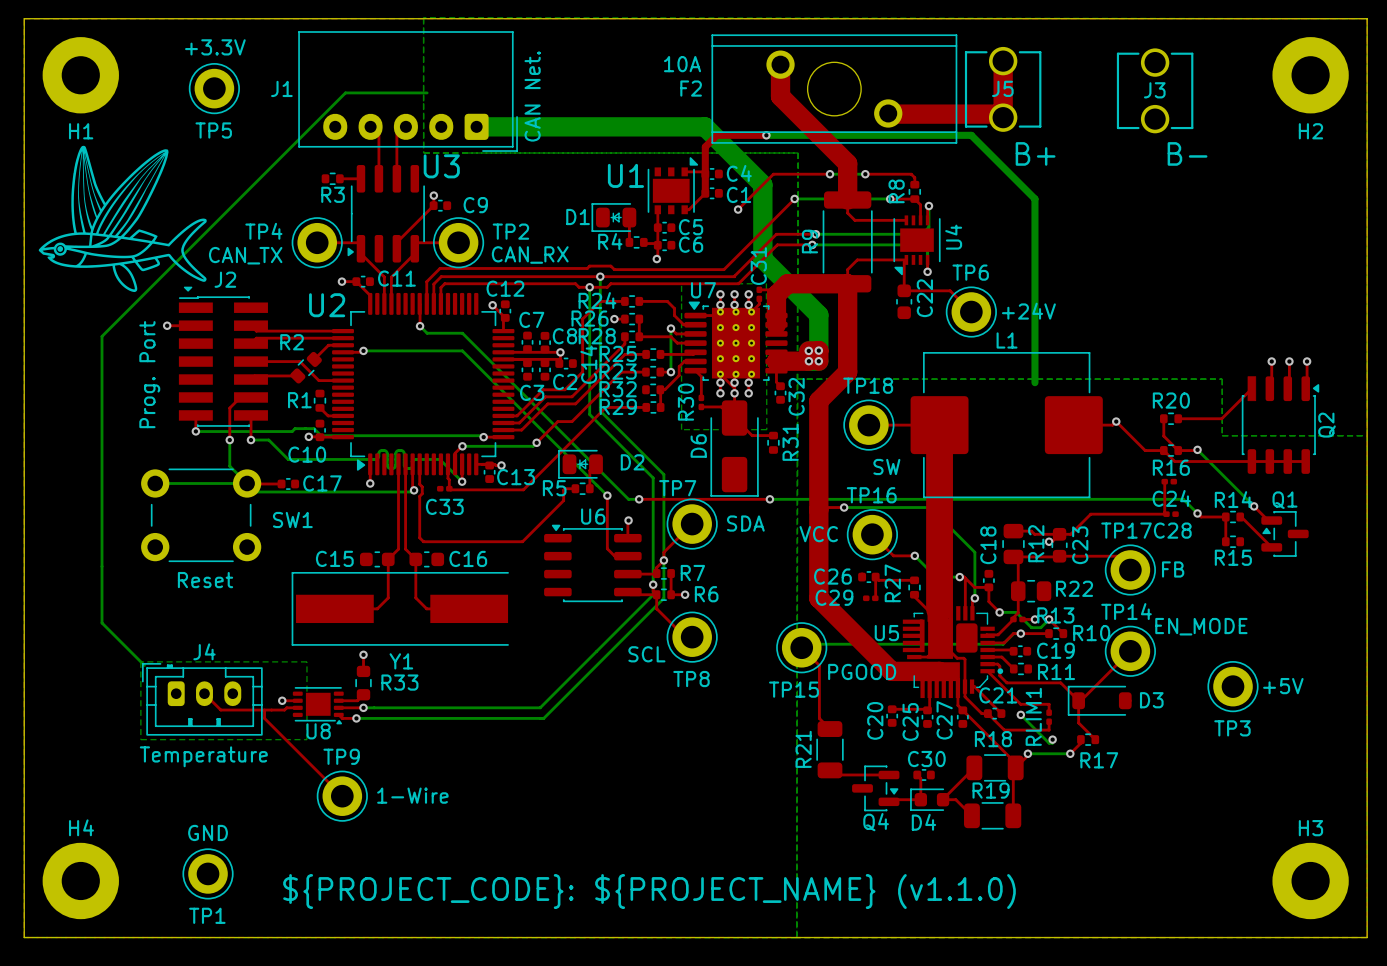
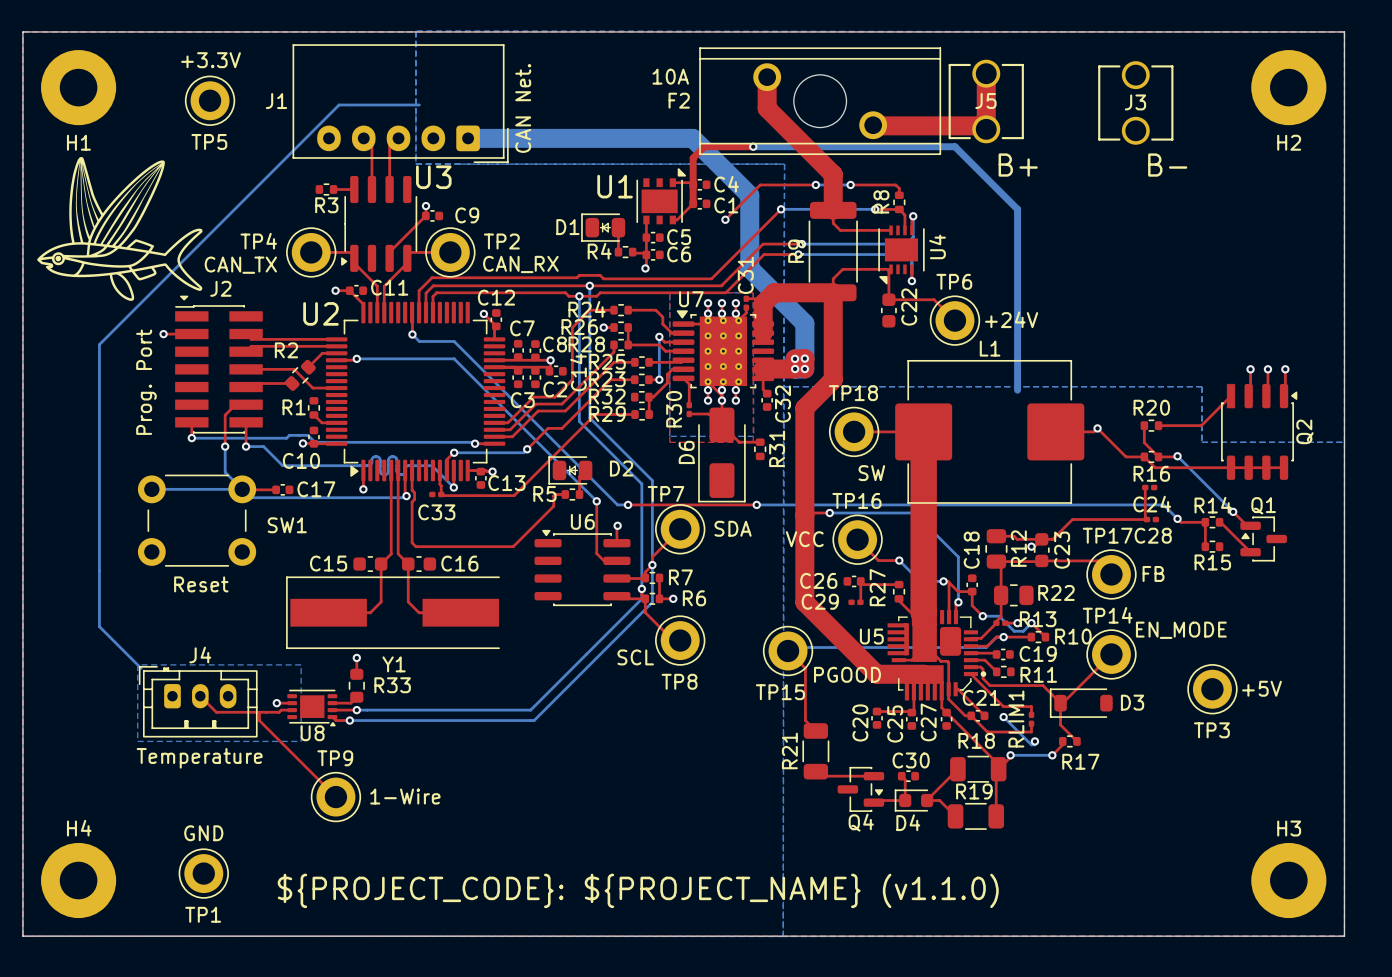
top zone outline: none -> (669, 292) (753, 292) (753, 442) (669, 442) (669, 292)

